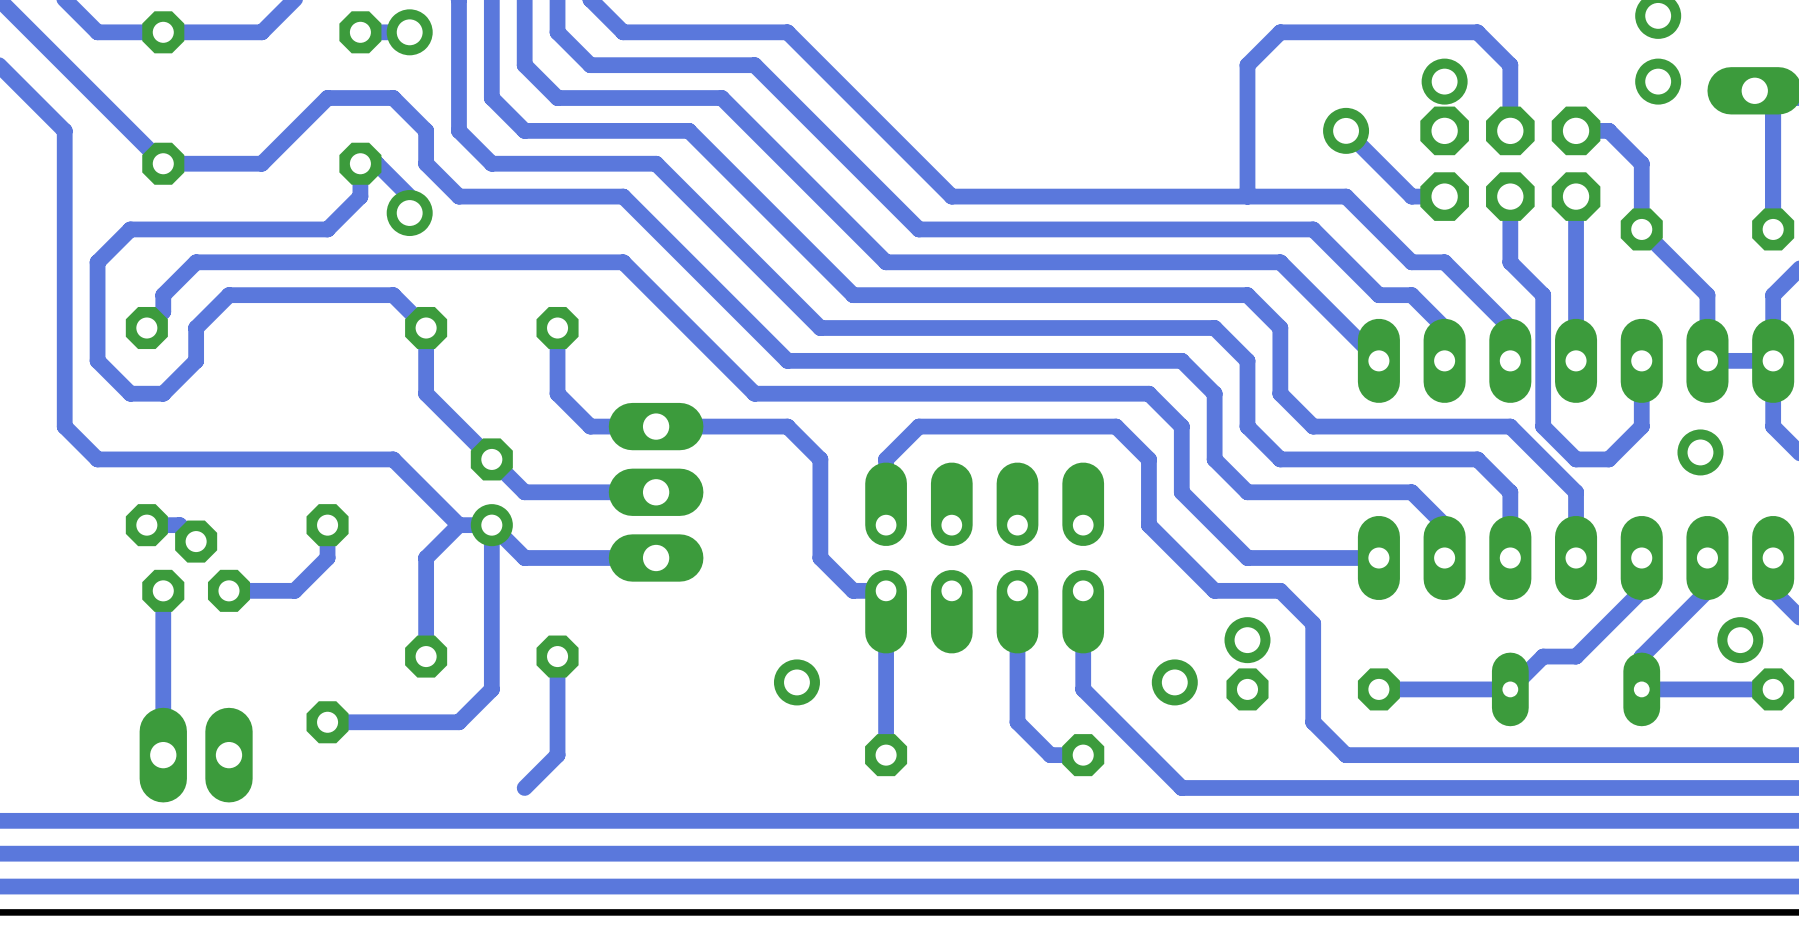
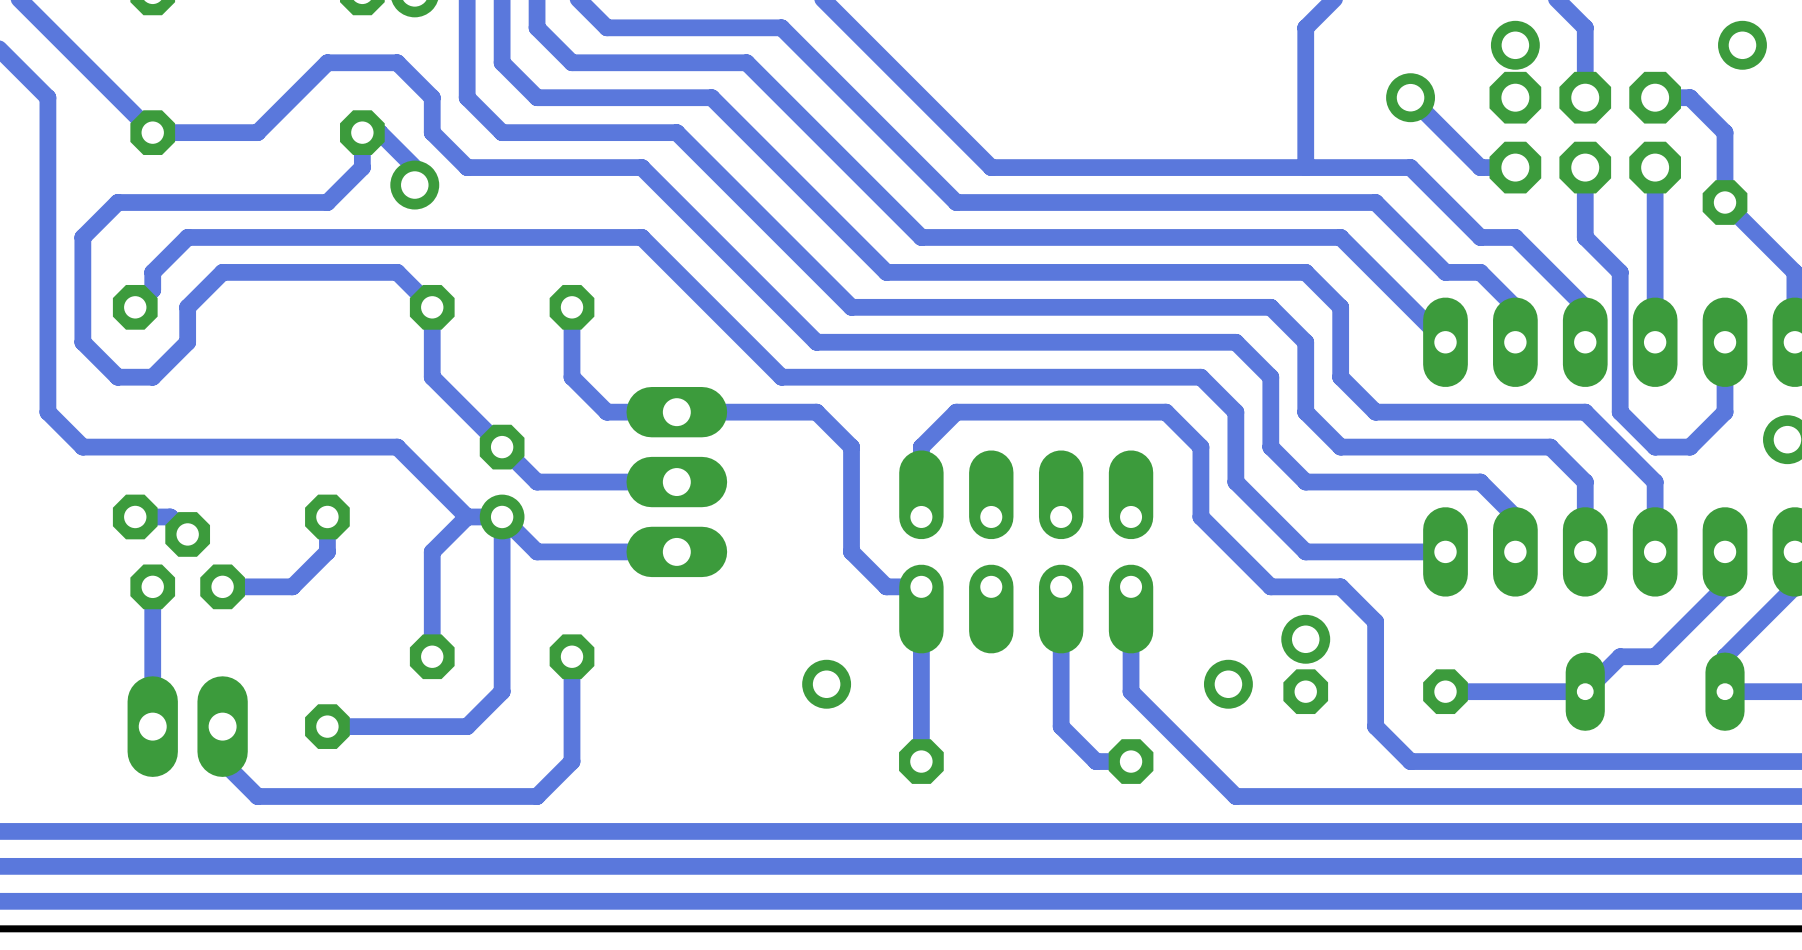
track: none -> (222, 726) (222, 761) (257, 796) (537, 796)
part position: (196, 755) -> (187, 726)

